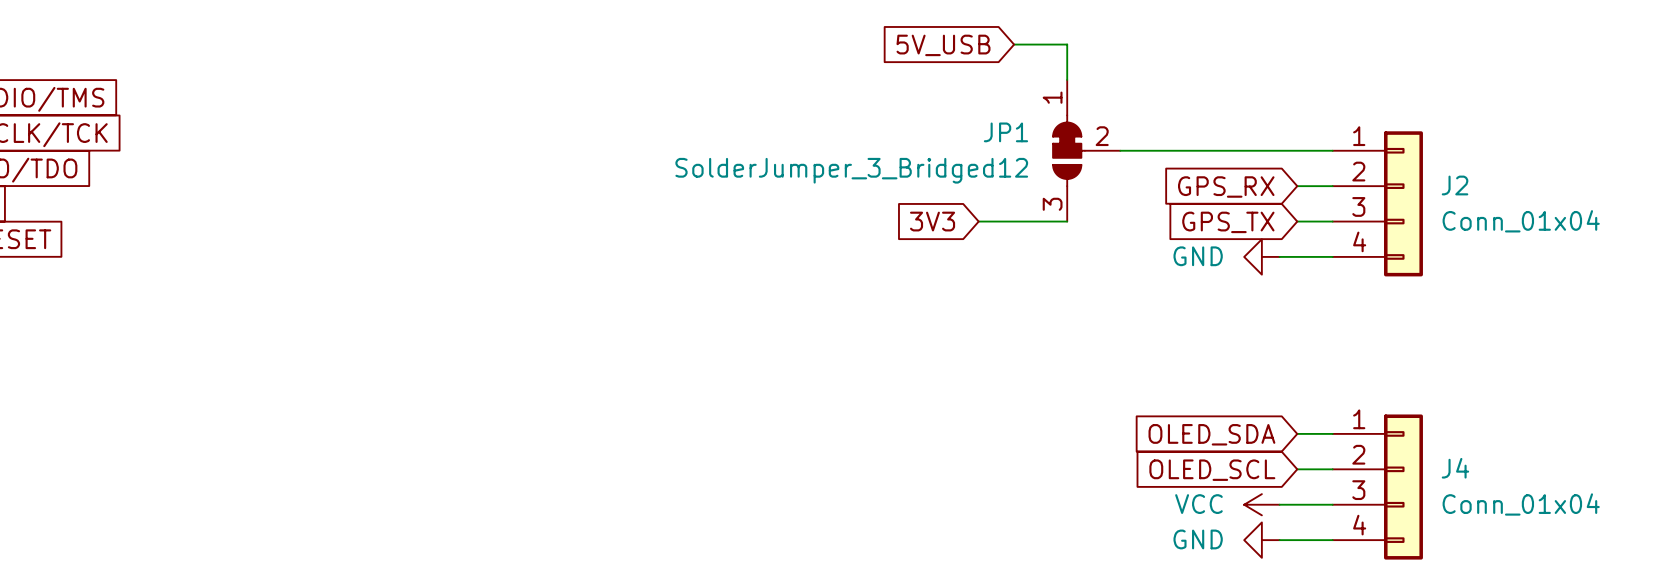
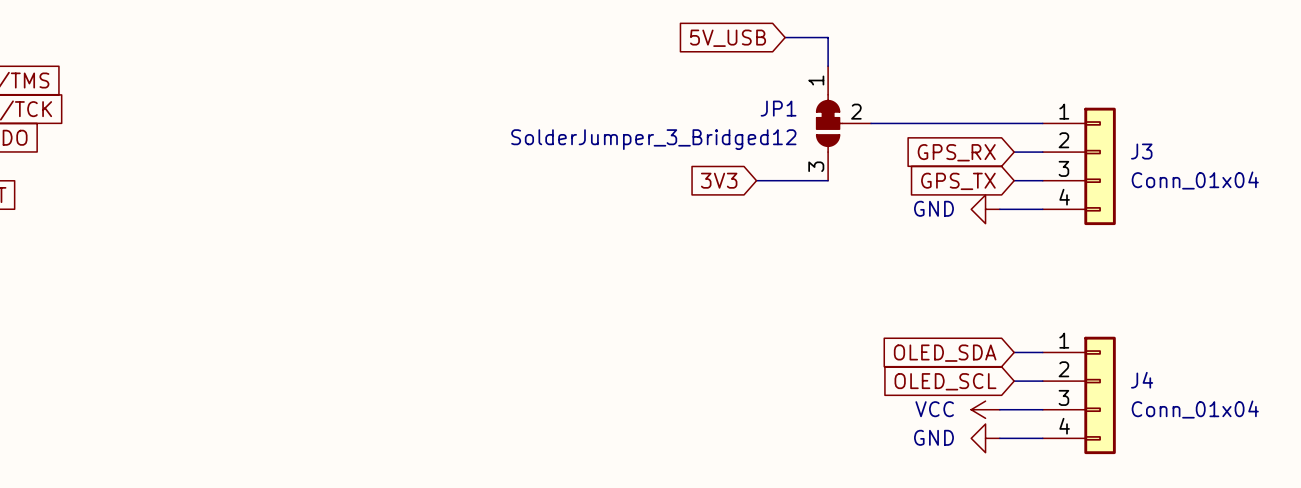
J2 name: J2 (1455, 185) -> J3 (1141, 151)

